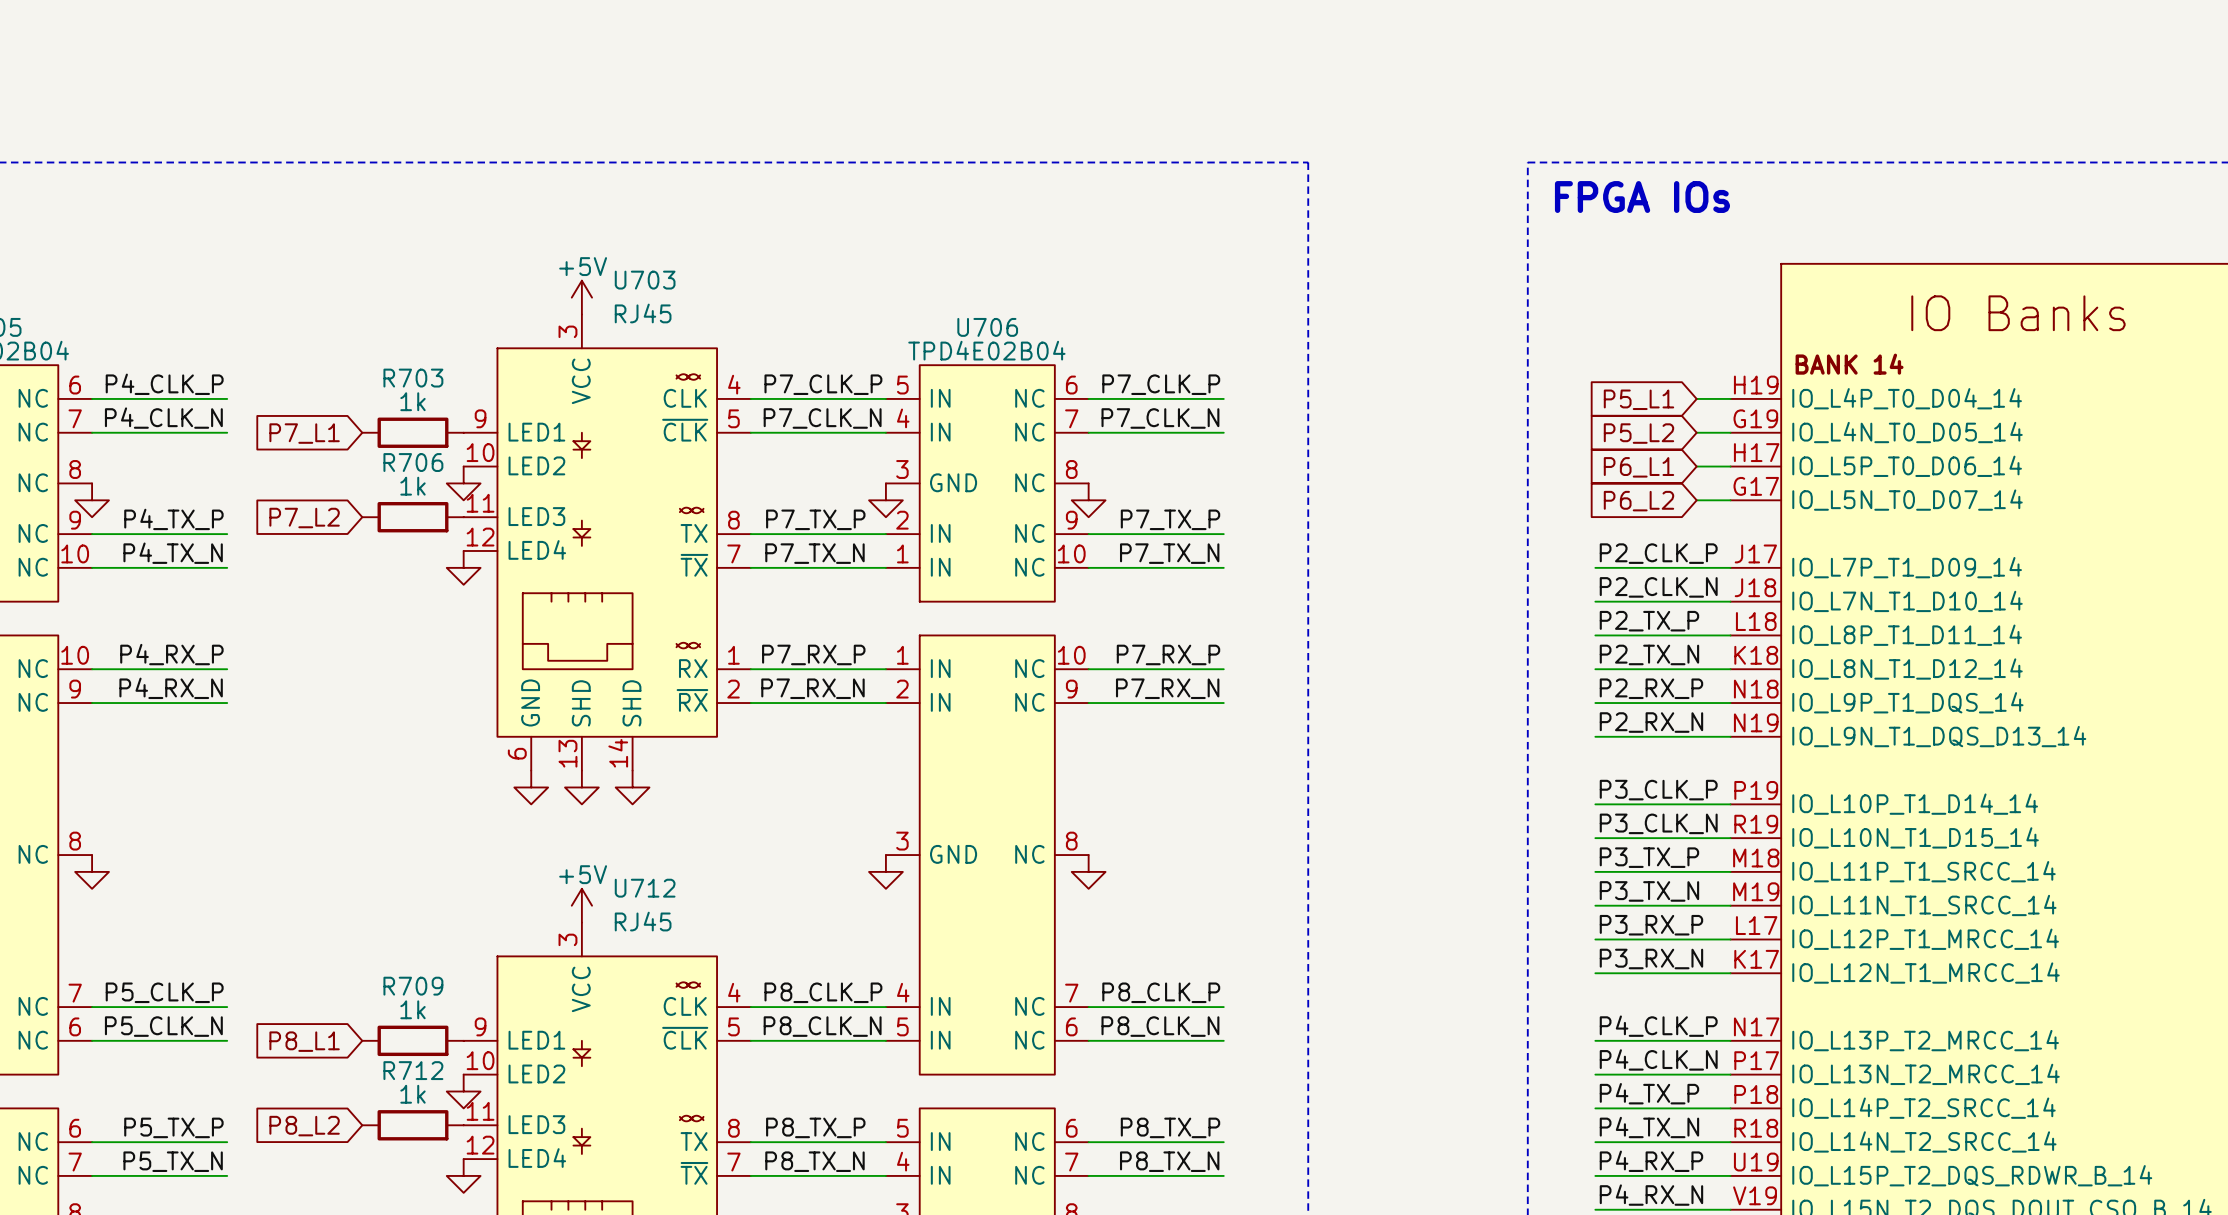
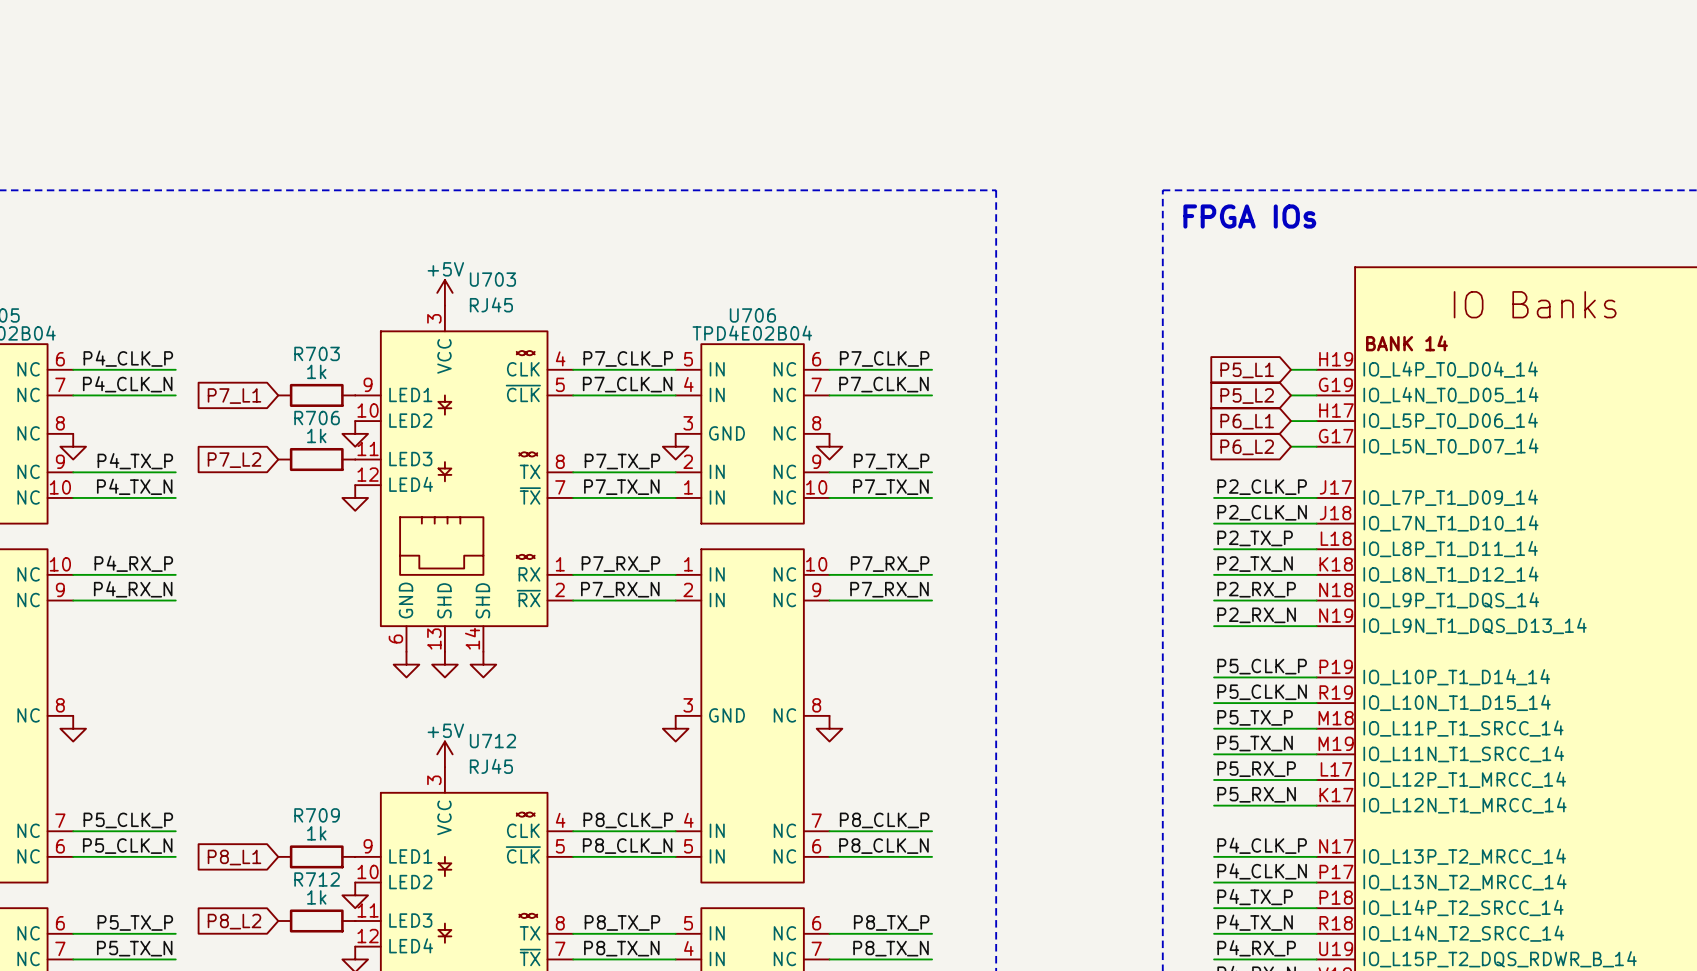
label: P3_CLK_P (1658, 790) -> P5_CLK_P (1262, 666)
label: P3_CLK_N (1658, 823) -> P5_CLK_N (1262, 692)
label: P3_TX_P (1649, 857) -> P5_TX_P (1255, 717)
label: P3_TX_N (1649, 891) -> P5_TX_N (1255, 743)
label: P3_RX_P (1651, 925) -> P5_RX_P (1256, 769)
label: P3_RX_N (1651, 959) -> P5_RX_N (1256, 794)

